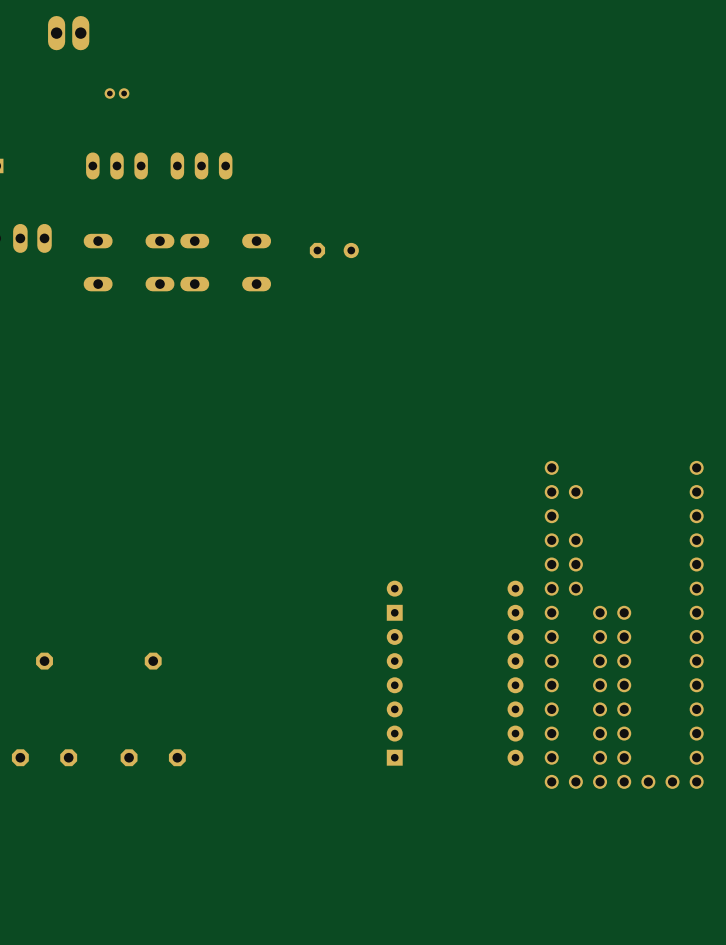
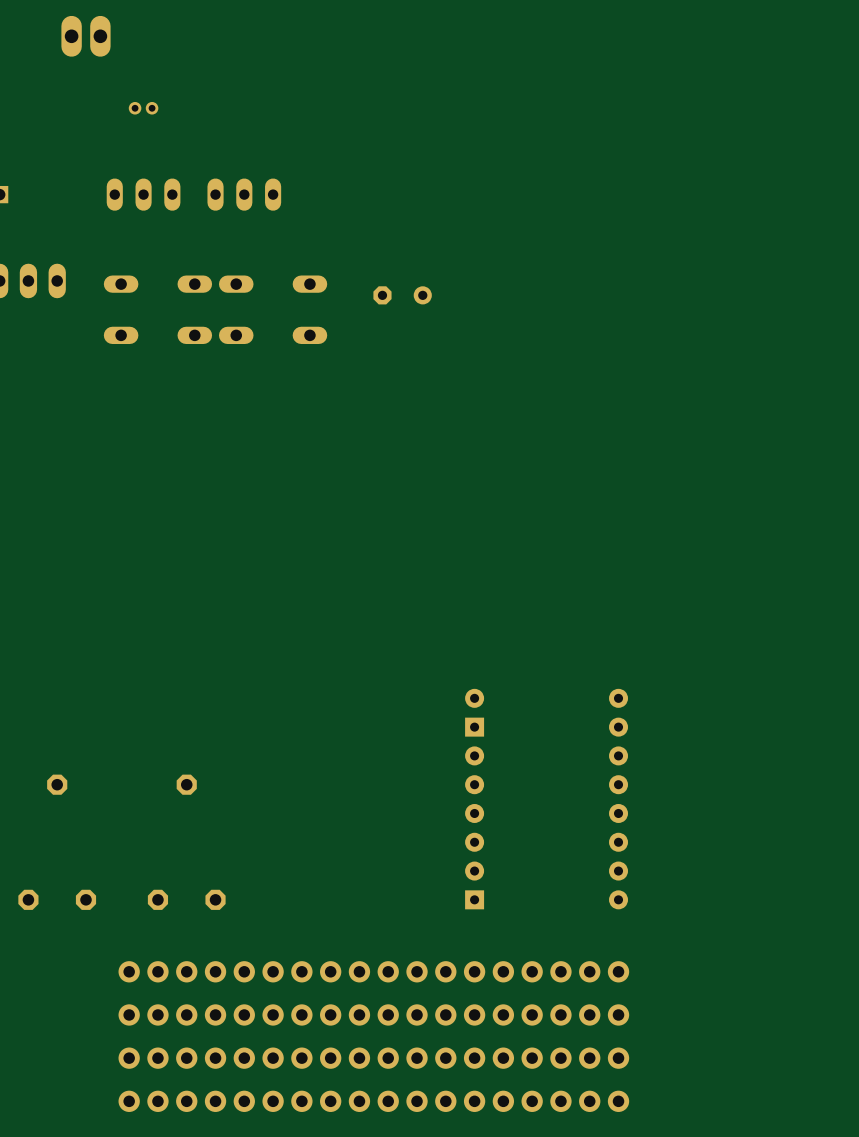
part: (624, 624) -> none
part: none -> (373, 971)
part: none -> (373, 1014)
part: none -> (373, 1058)
part: none -> (373, 1101)

